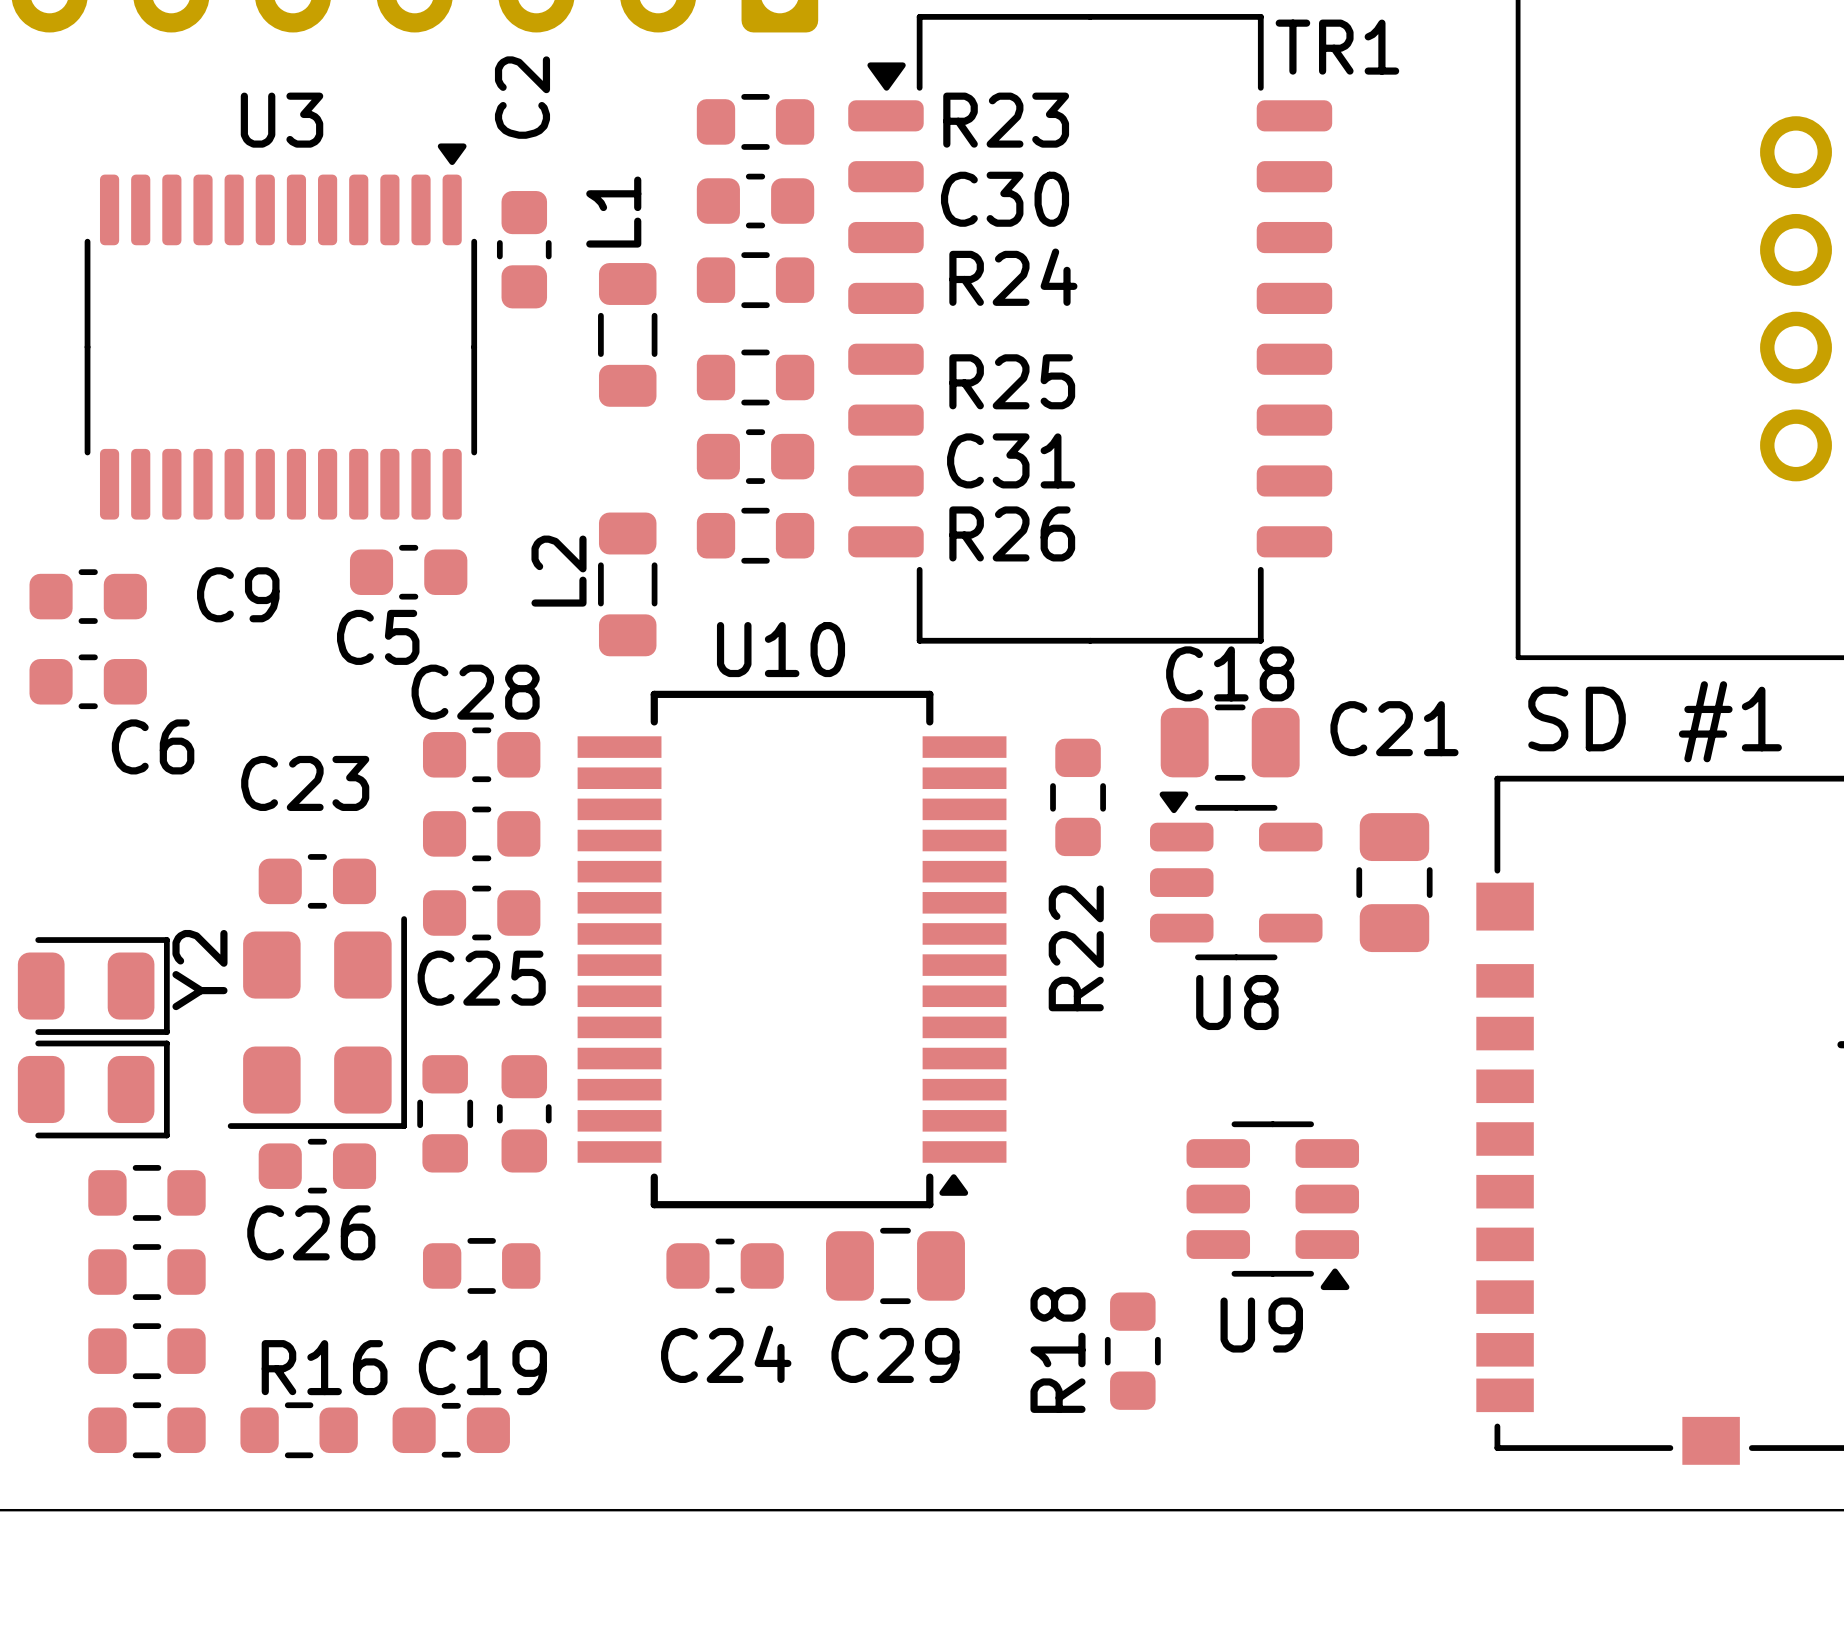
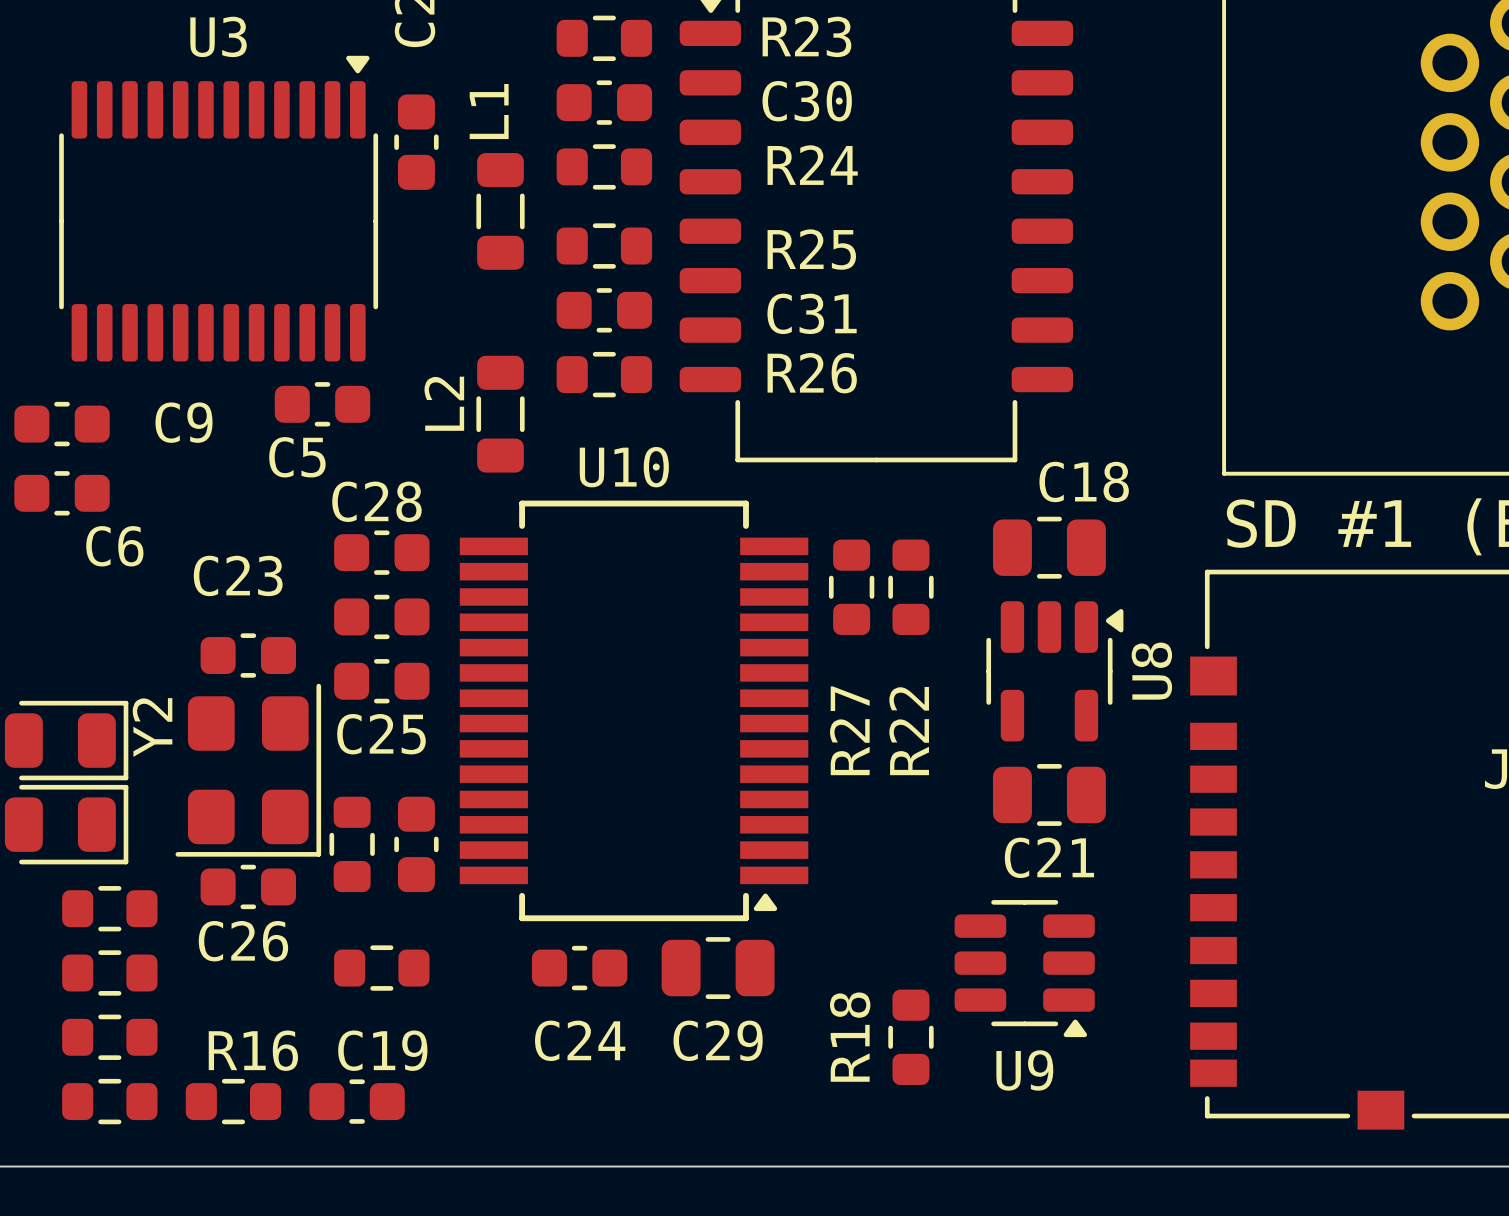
C18 name position: C18 (1230, 673) -> C18 (1084, 481)
C21 name position: C21 (1394, 728) -> C21 (1049, 857)
C18 position: (1230, 742) -> (1049, 547)
R27: none -> (851, 587)
R22 position: (1078, 797) -> (910, 587)
U8 rotation: 0° (1236, 875) -> 90° clockwise (1054, 671)
C21 rotation: 0° (1394, 882) -> 90° clockwise (1049, 794)
C21 position: (1394, 882) -> (1049, 794)
R22 name position: R22 (1076, 948) -> R22 (909, 731)
U8 name position: U8 (1237, 1002) -> U8 (1151, 671)
U9 position: (1272, 1205) -> (1024, 968)
U9 name position: U9 (1261, 1325) -> U9 (1024, 1070)

